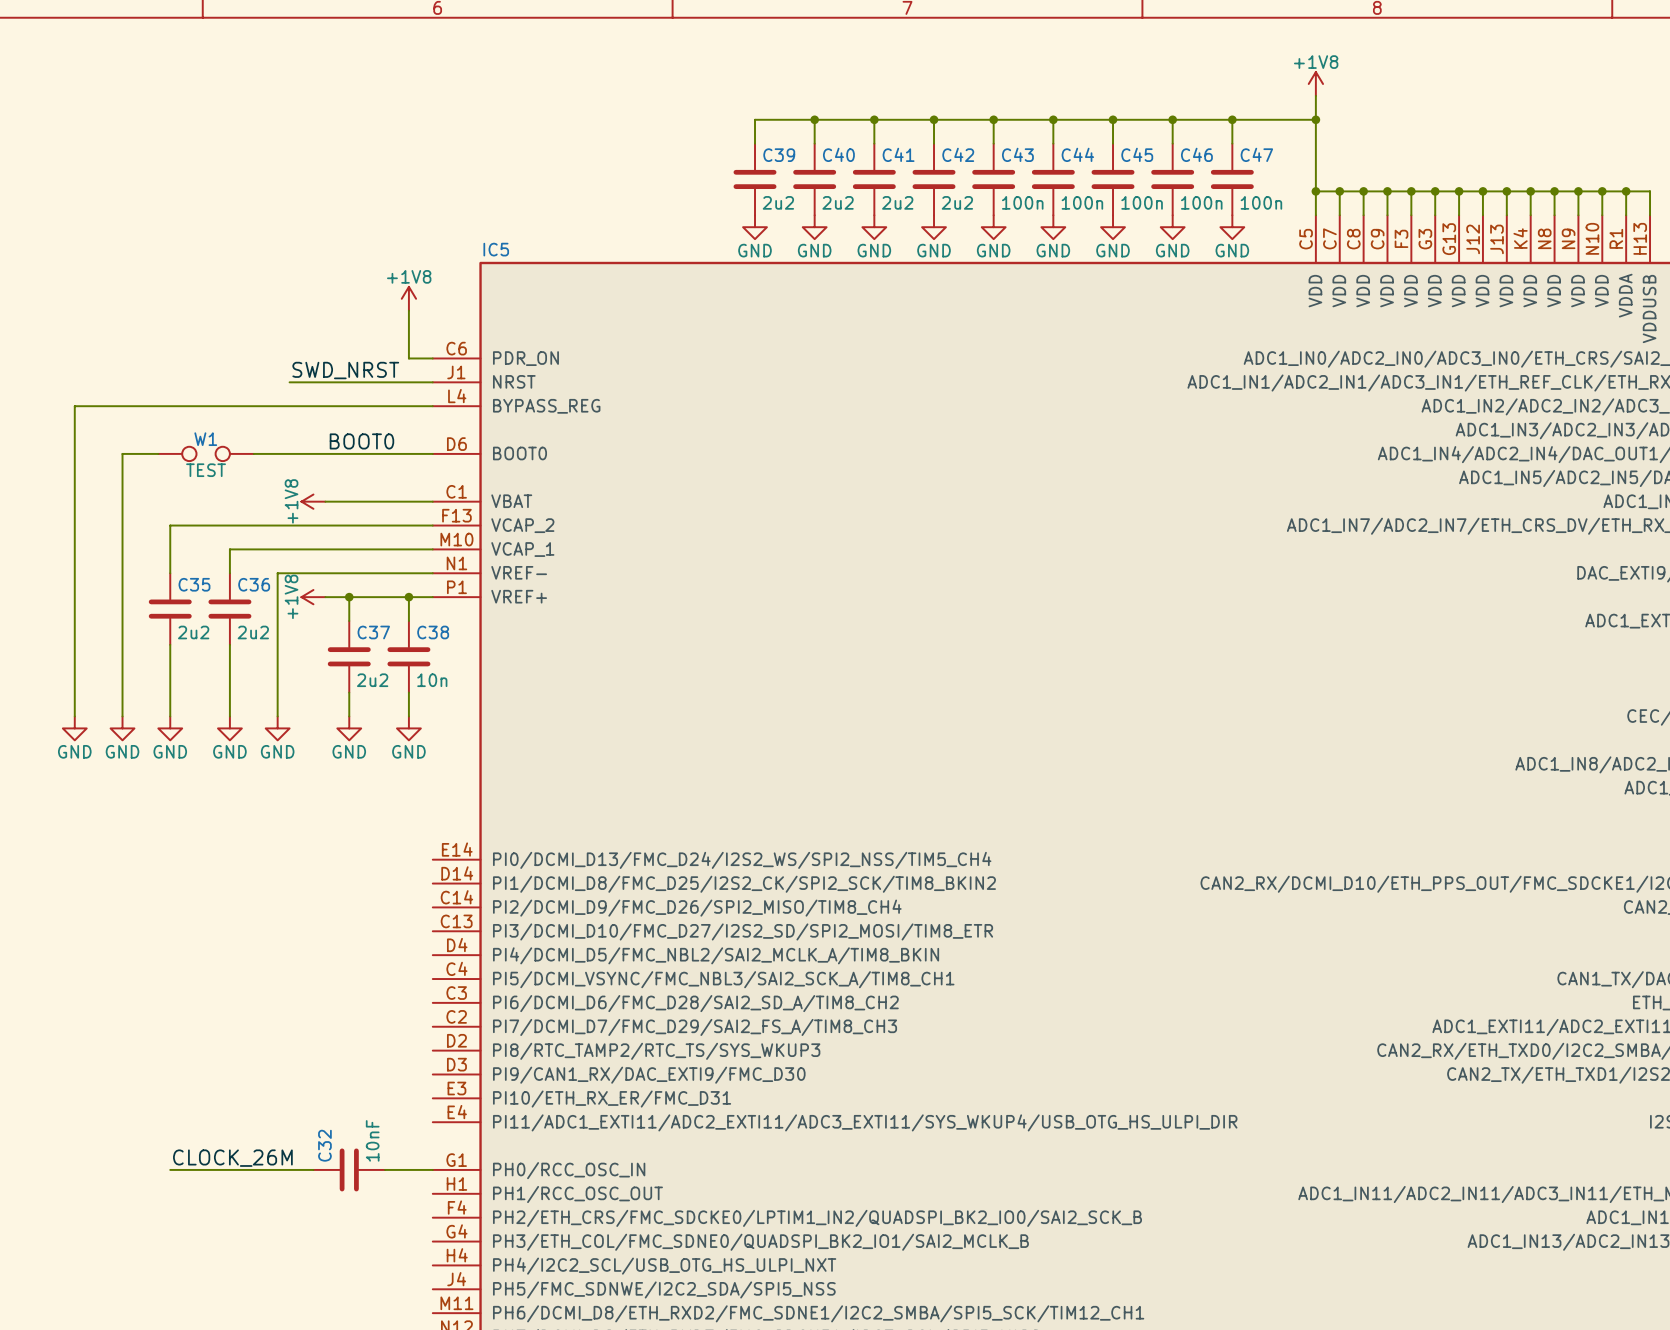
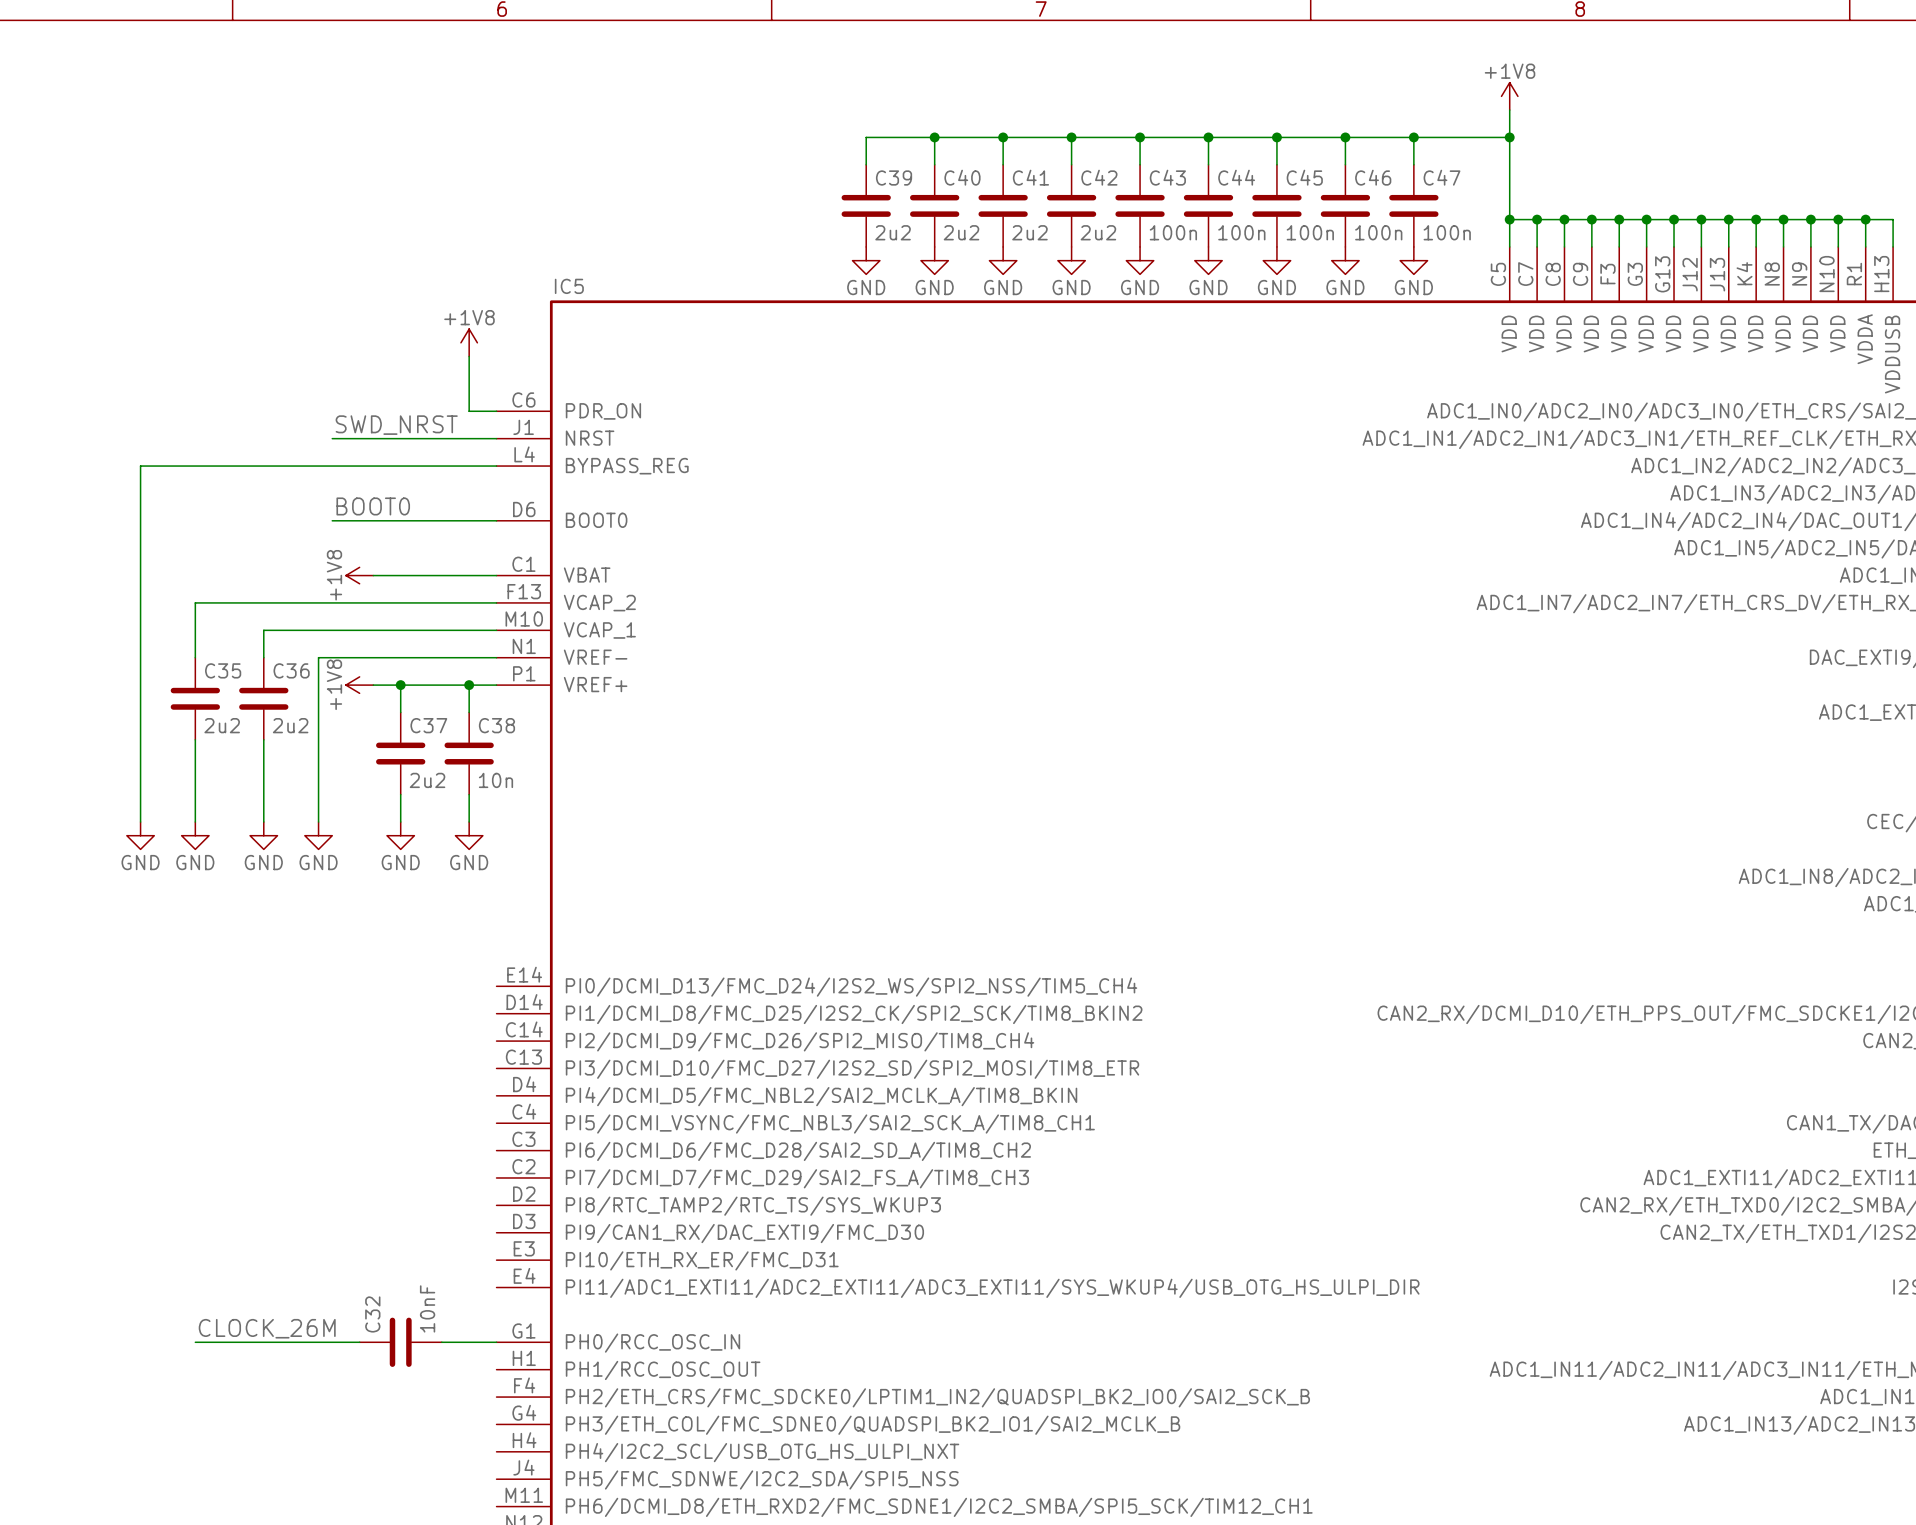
wire: (122, 406) (74, 406) (74, 716) -> none
label position: BOOT0 (361, 441) -> BOOT0 (373, 506)
wire: (122, 453) (158, 453) -> (140, 520) (140, 466)
W1: TEST (206, 453) -> none
wire: (253, 453) (289, 453) -> none
power symbol: GND (74, 728) -> none

